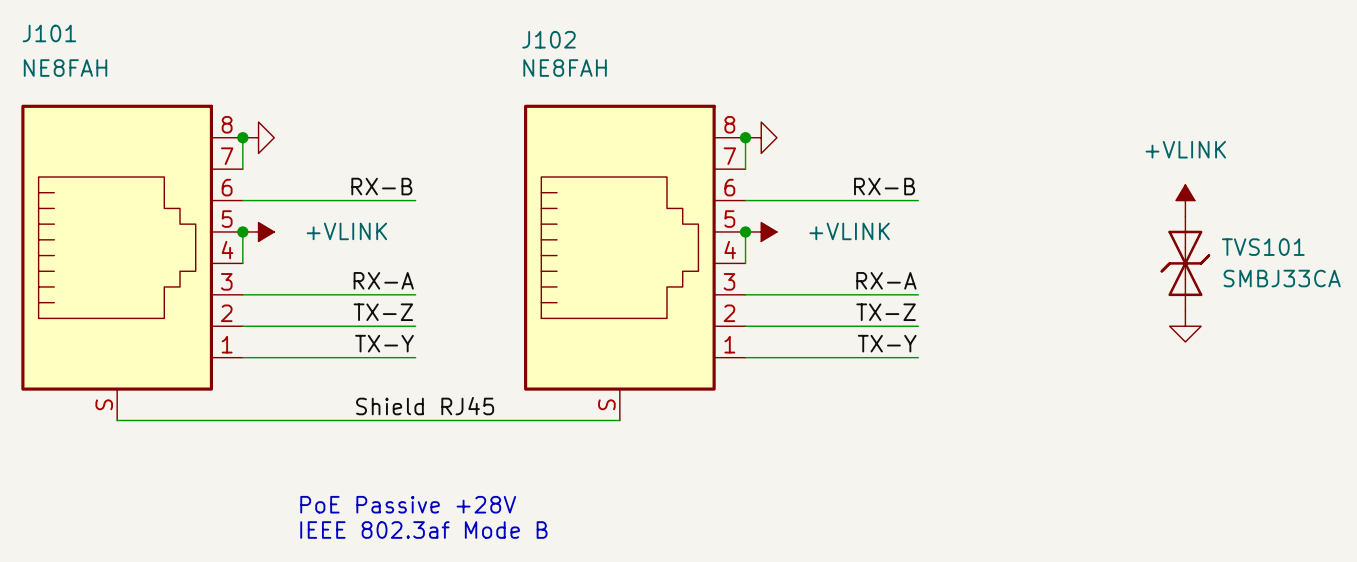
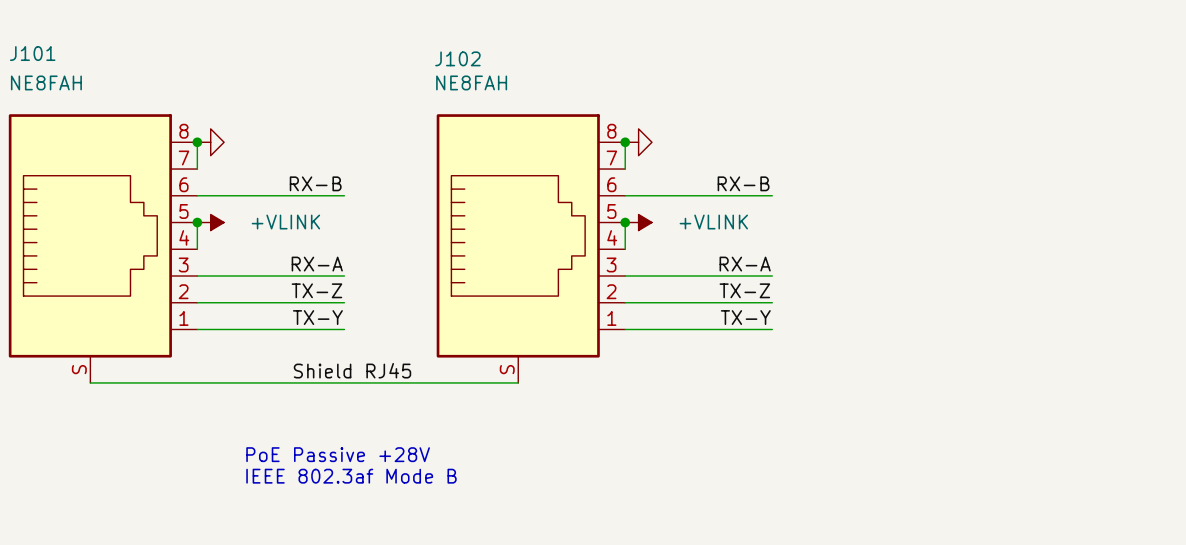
power symbol: +VLINK (1185, 200) -> none
TVS101: SMBJ33CA (1185, 263) -> none
power symbol: (1185, 326) -> none

